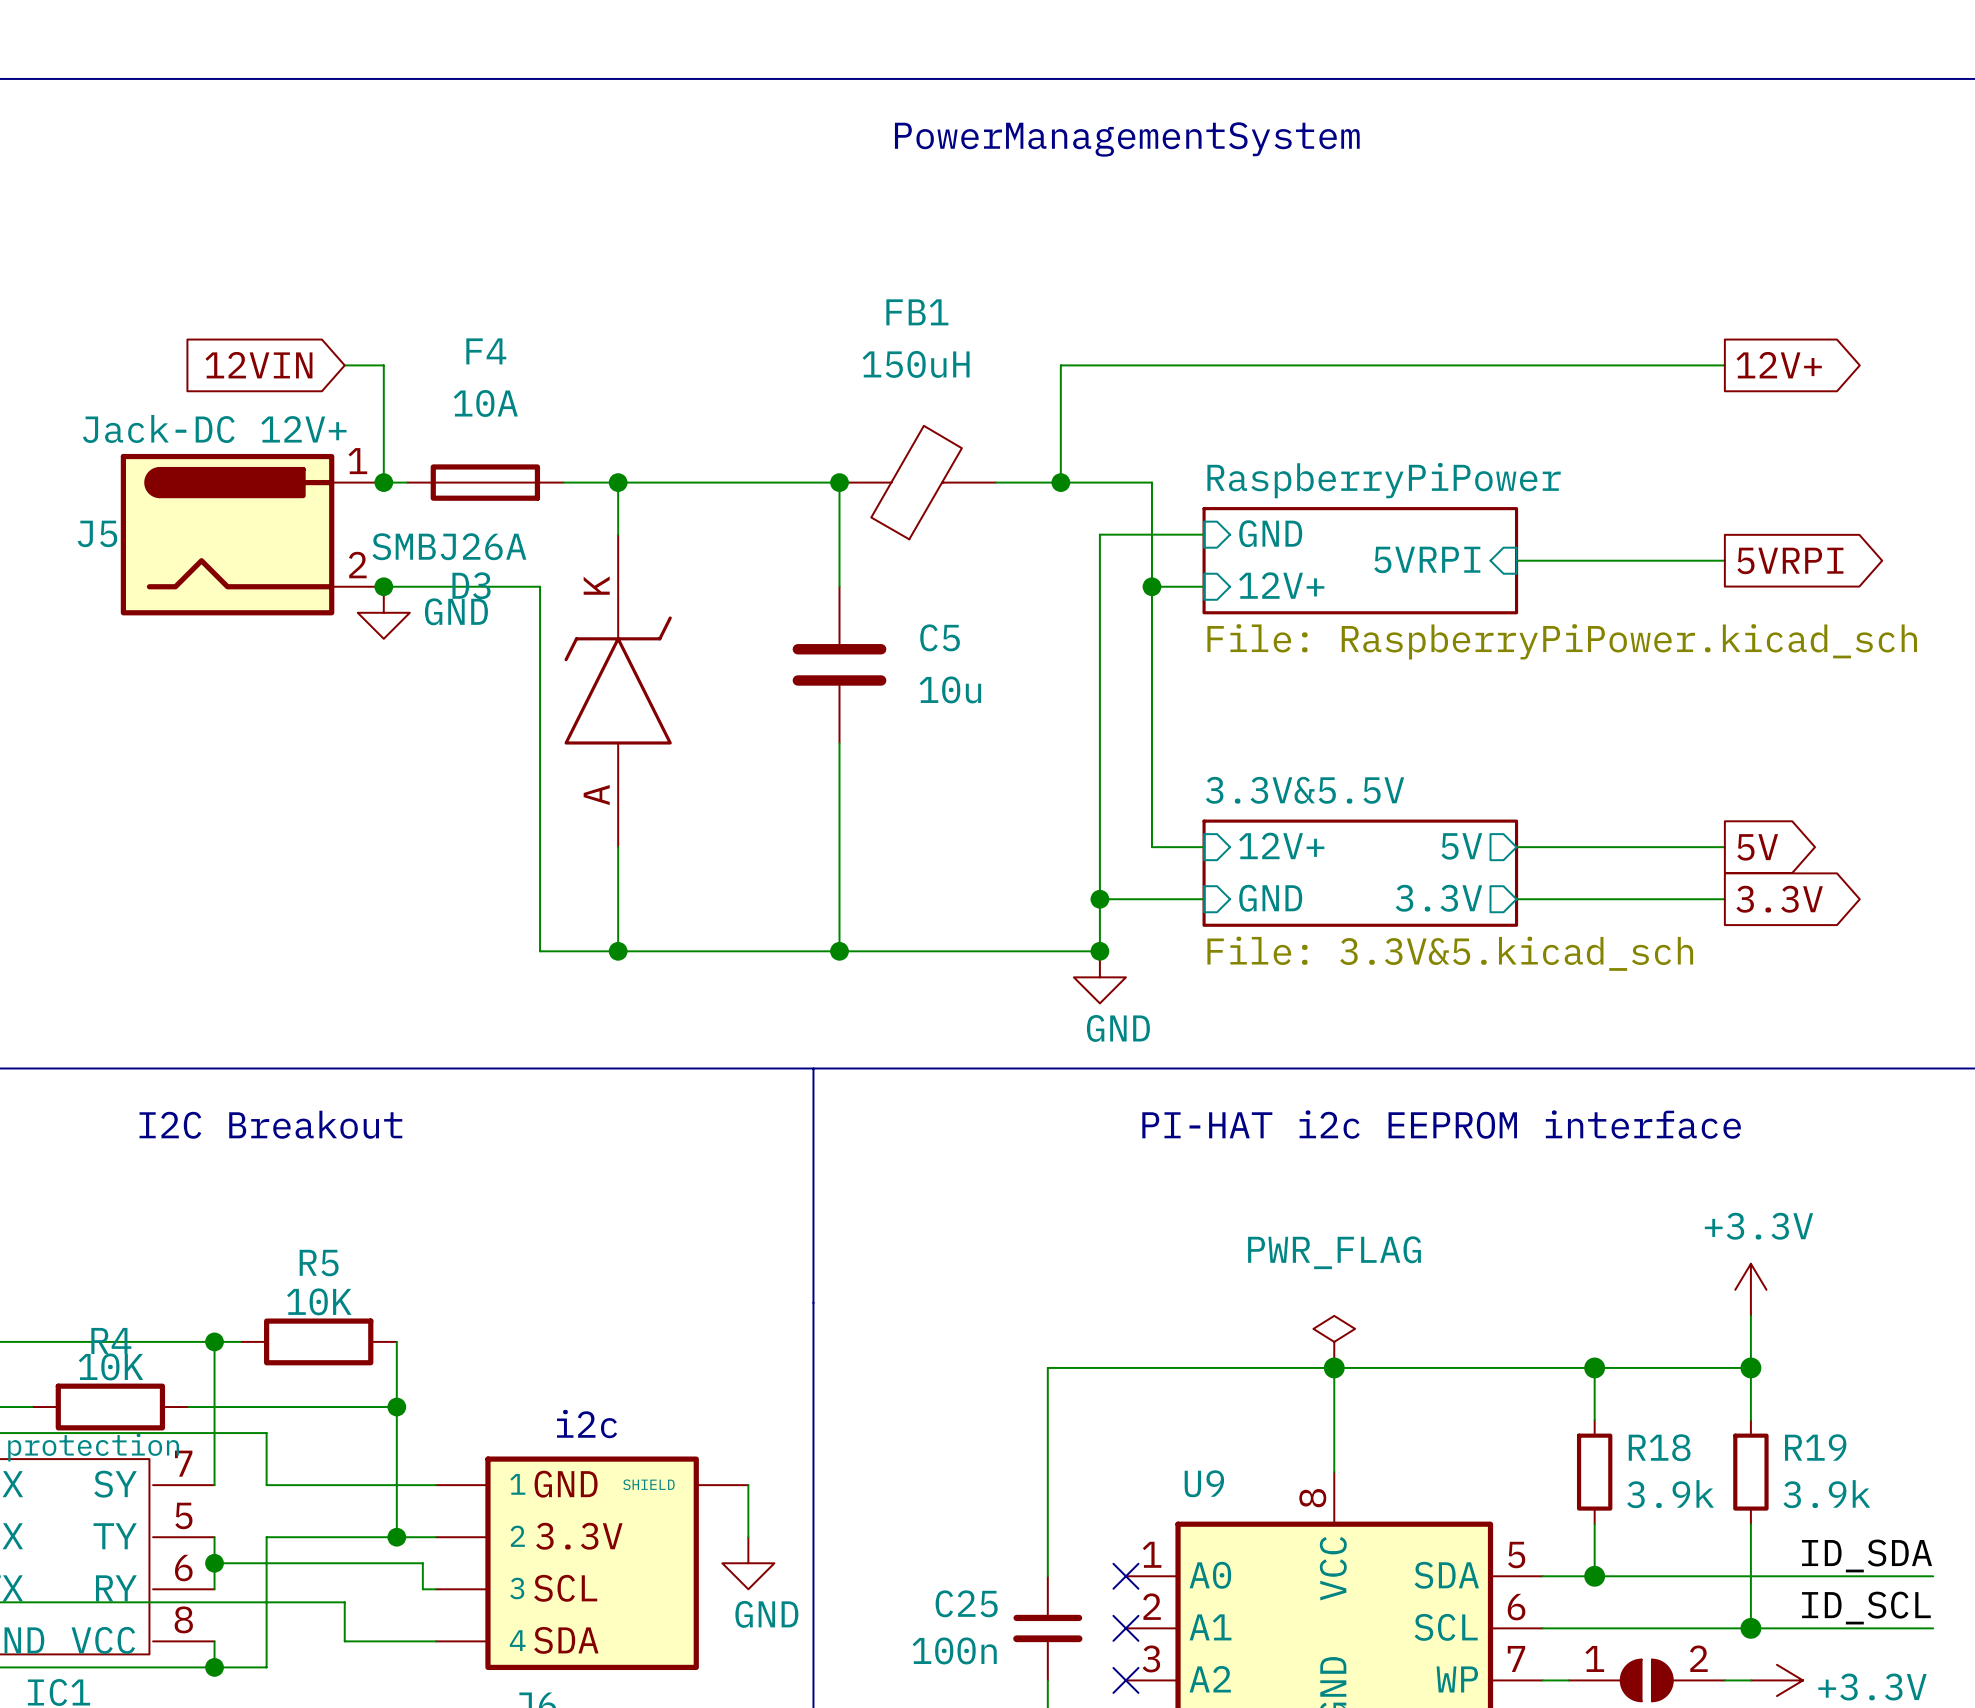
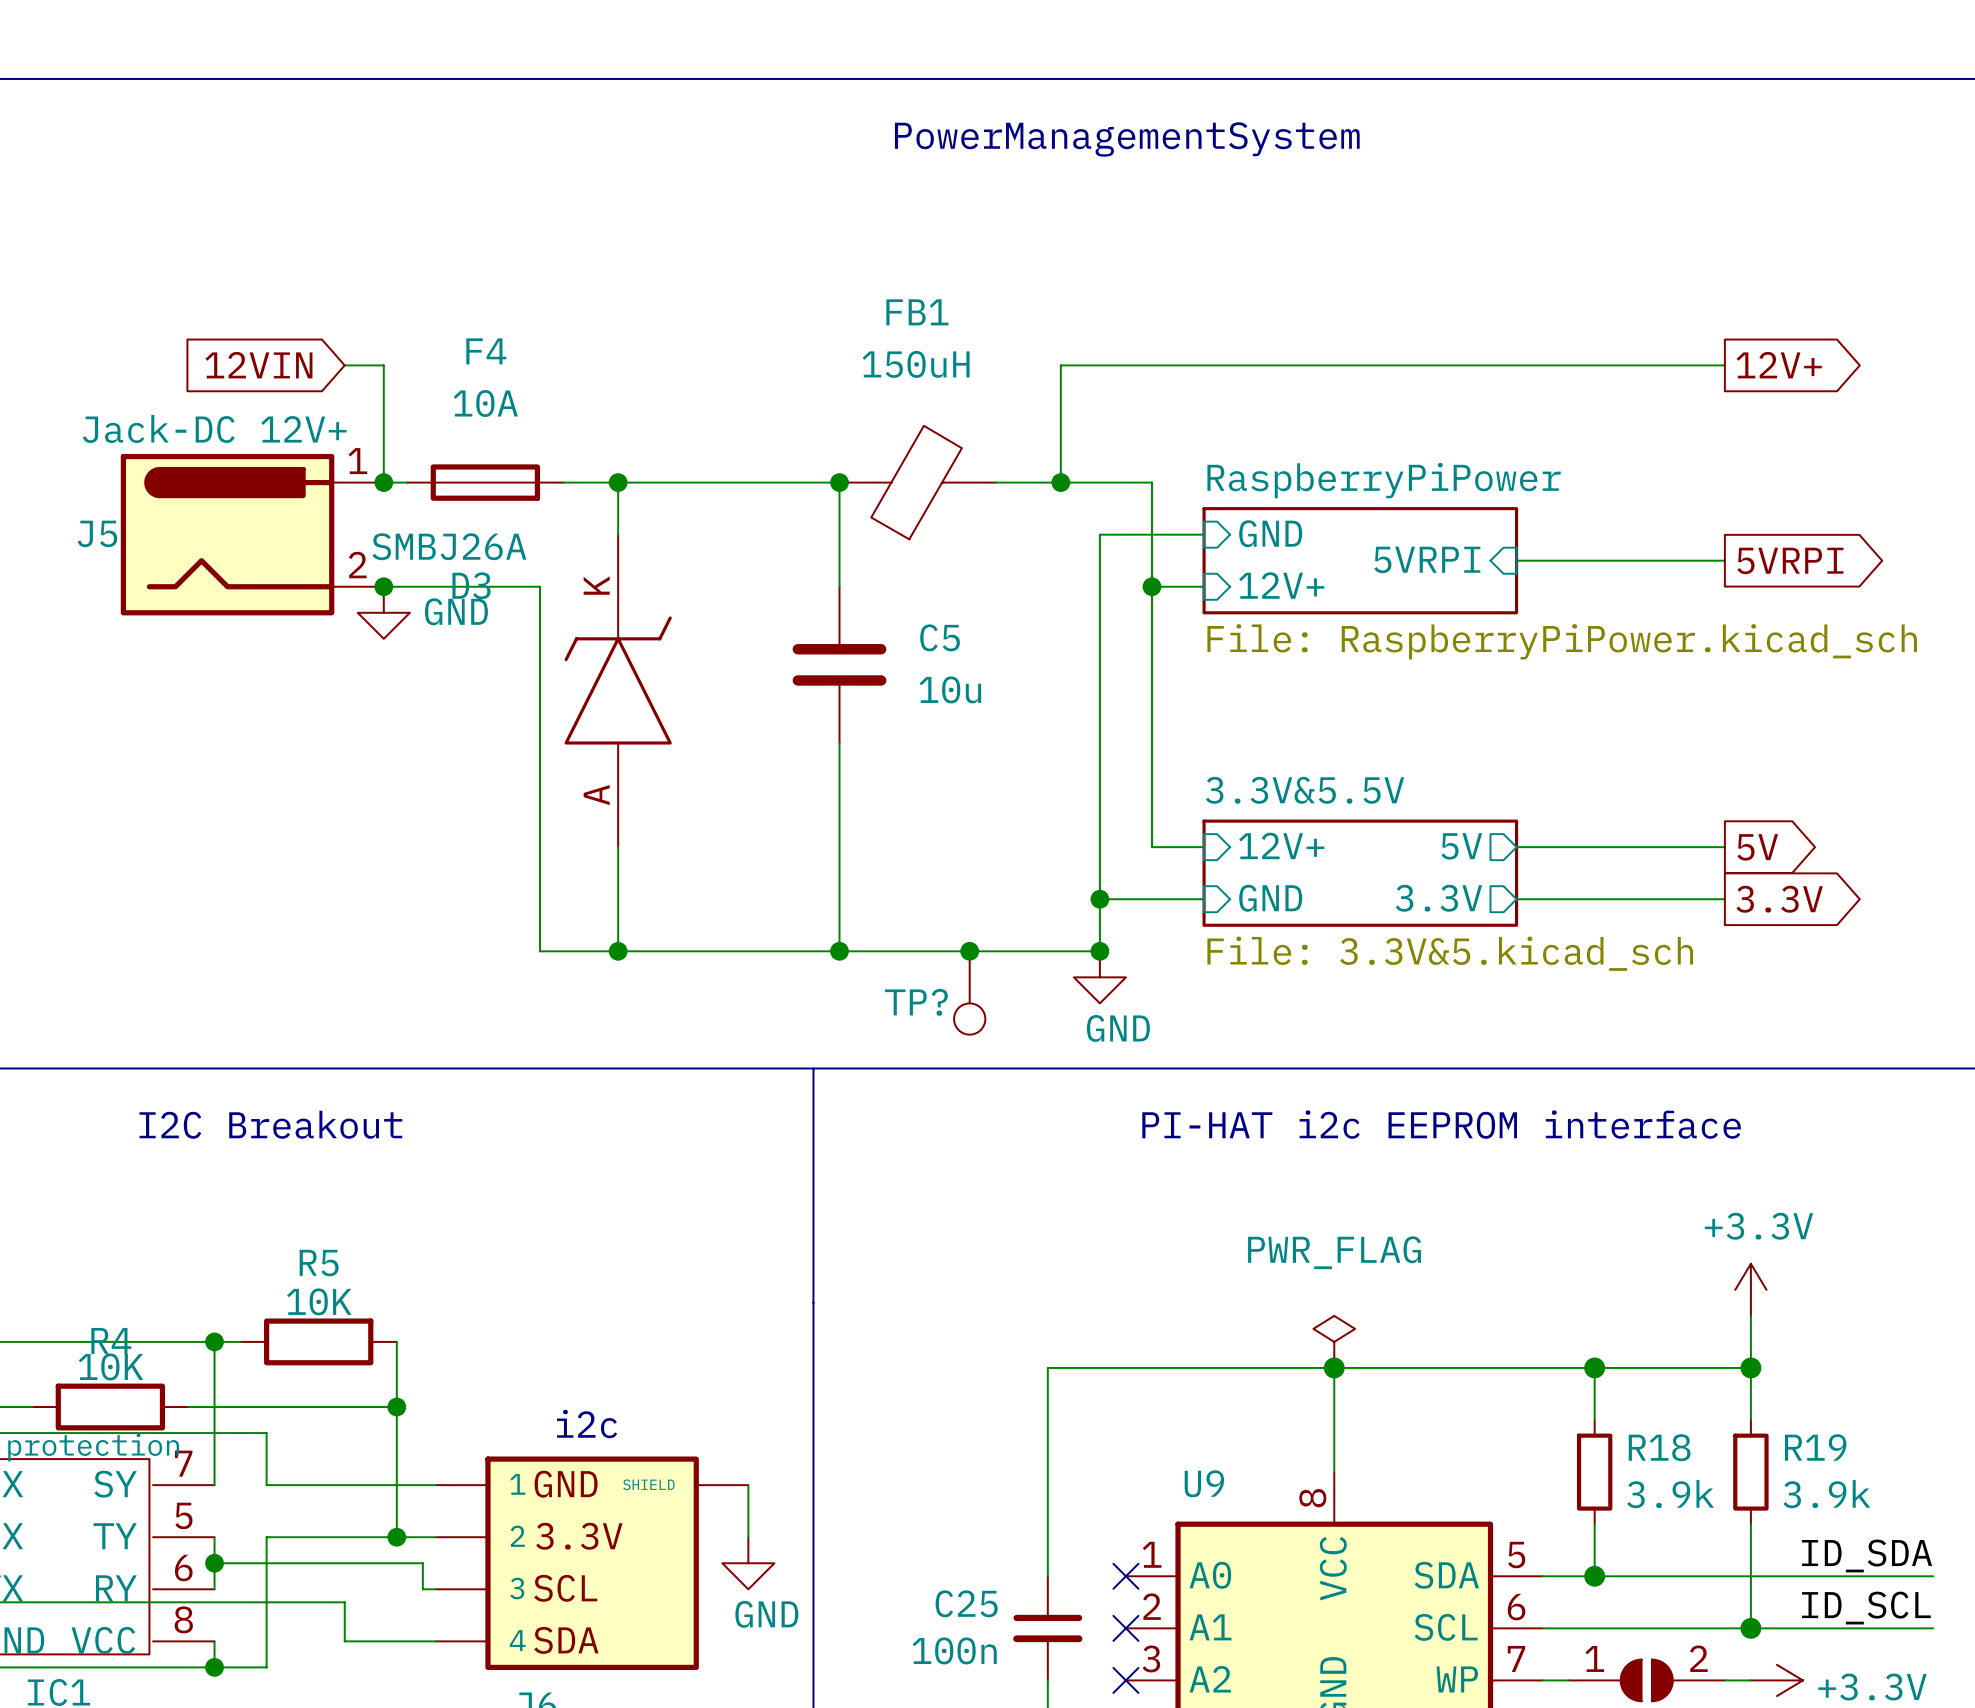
junction: none -> (969, 951)
TP?: none -> (969, 992)

